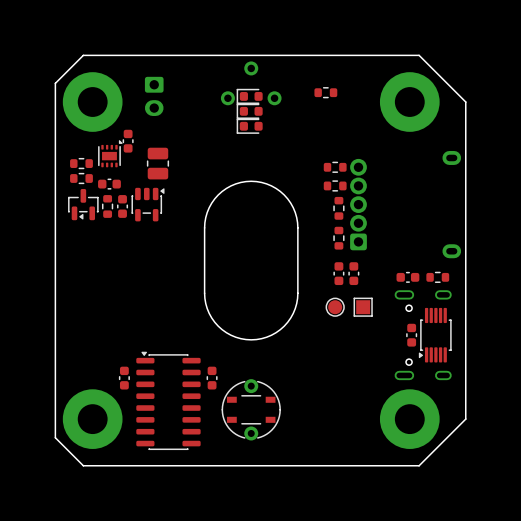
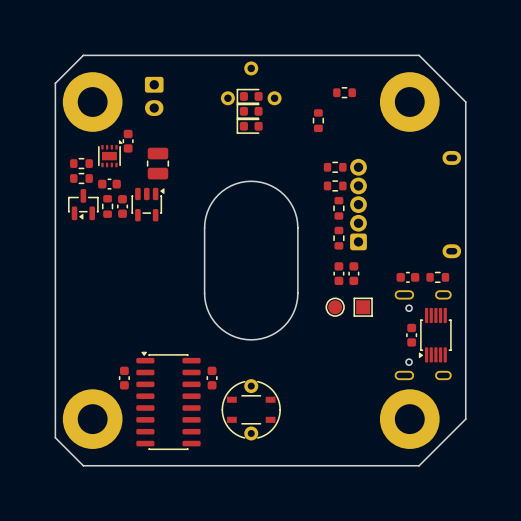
part: (325, 92) -> none
part: none -> (344, 92)
part: none -> (318, 120)

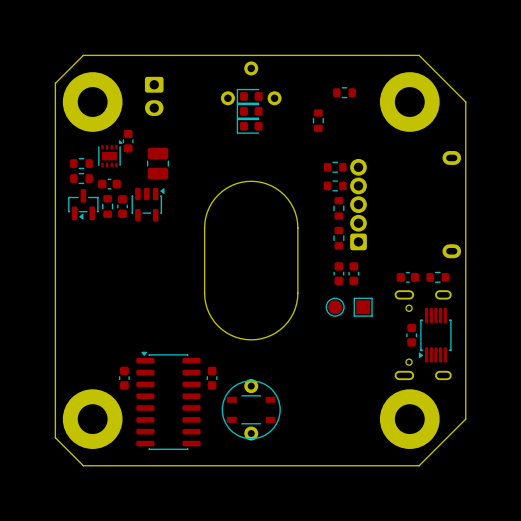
part: (251, 409) -> none
part: none -> (251, 409)

